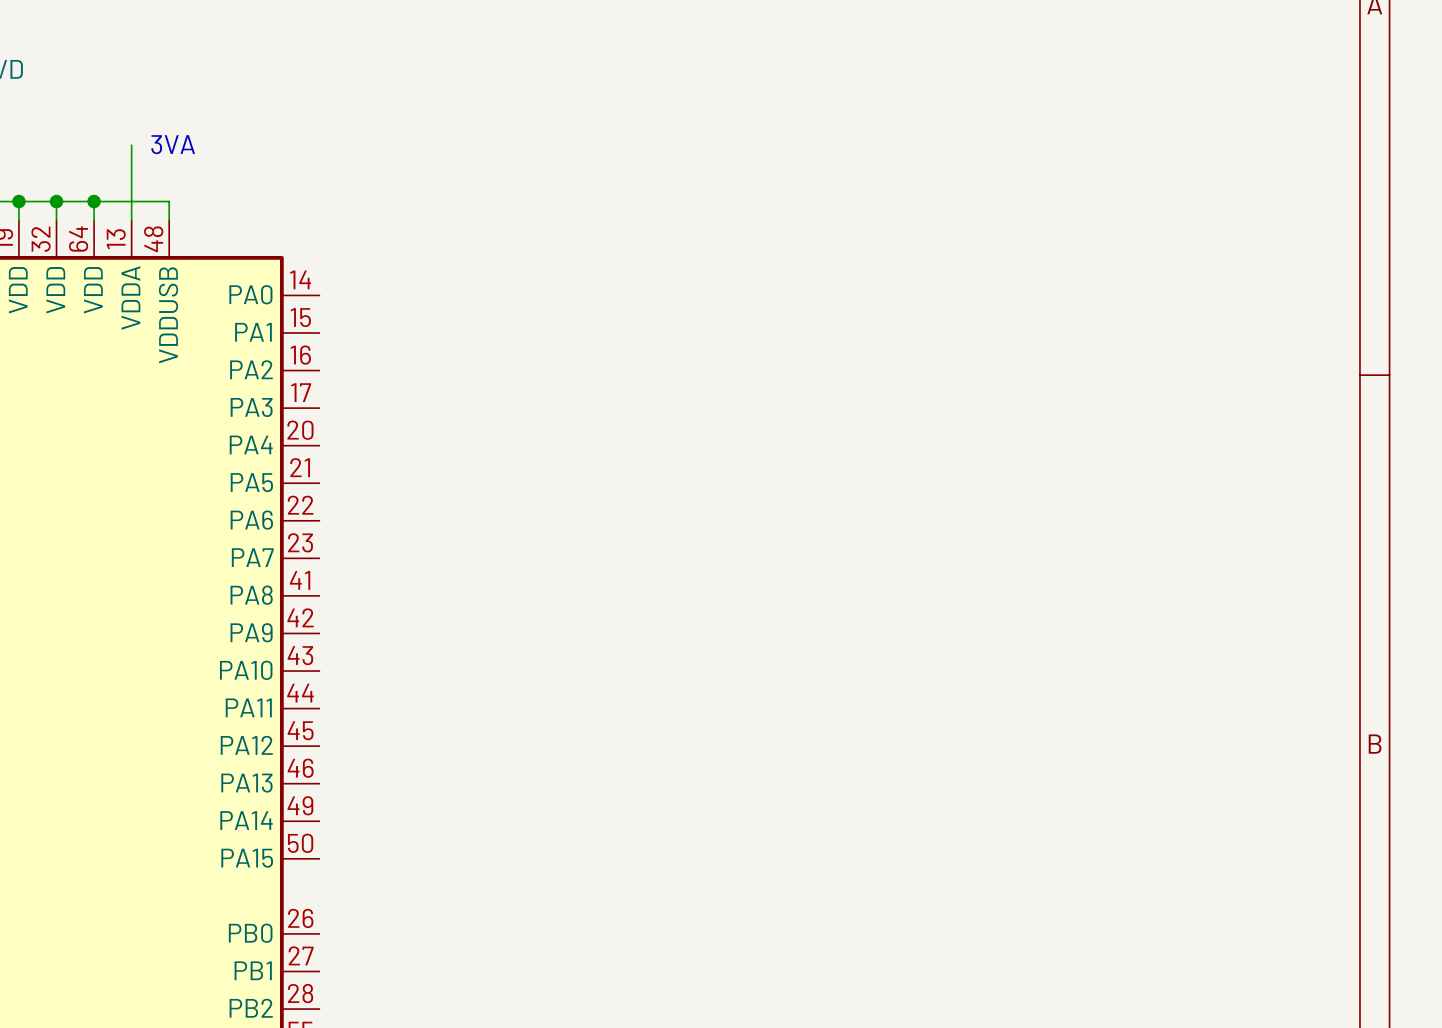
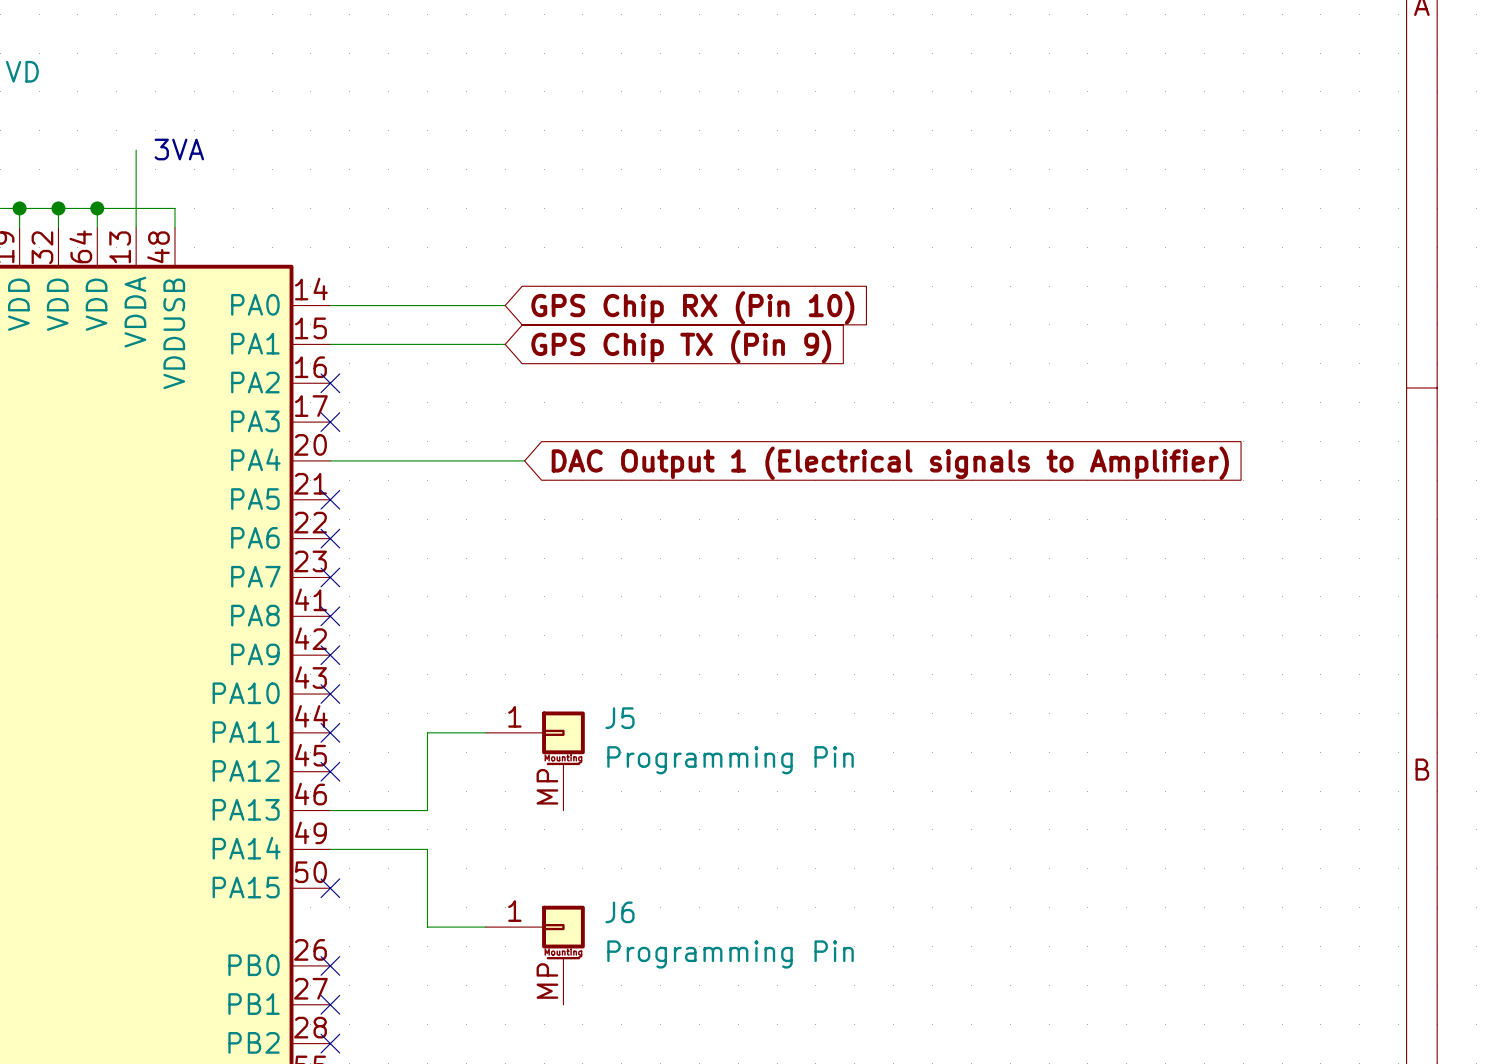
wire: none -> (330, 305) (505, 305)
global label: none -> GPS Chip RX (Pin 10) (692, 307)
wire: none -> (330, 344) (505, 344)
global label: none -> GPS Chip TX (Pin 9) (681, 346)
no-connect mark: none -> (330, 383)
no-connect mark: none -> (330, 422)
wire: none -> (330, 460) (524, 460)
global label: none -> DAC Output 1 (Electrical signals to Amplifier) (890, 463)
no-connect mark: none -> (330, 499)
no-connect mark: none -> (330, 538)
no-connect mark: none -> (330, 577)
no-connect mark: none -> (330, 616)
no-connect mark: none -> (330, 655)
no-connect mark: none -> (330, 694)
no-connect mark: none -> (330, 732)
wire: none -> (485, 732) (427, 732) (427, 810) (330, 810)
J5: none -> Programming Pin (535, 761)
no-connect mark: none -> (330, 771)
wire: none -> (330, 849) (427, 849) (427, 927) (485, 927)
no-connect mark: none -> (330, 888)
J6: none -> Programming Pin (535, 955)
no-connect mark: none -> (330, 965)
no-connect mark: none -> (330, 1004)
no-connect mark: none -> (330, 1043)

